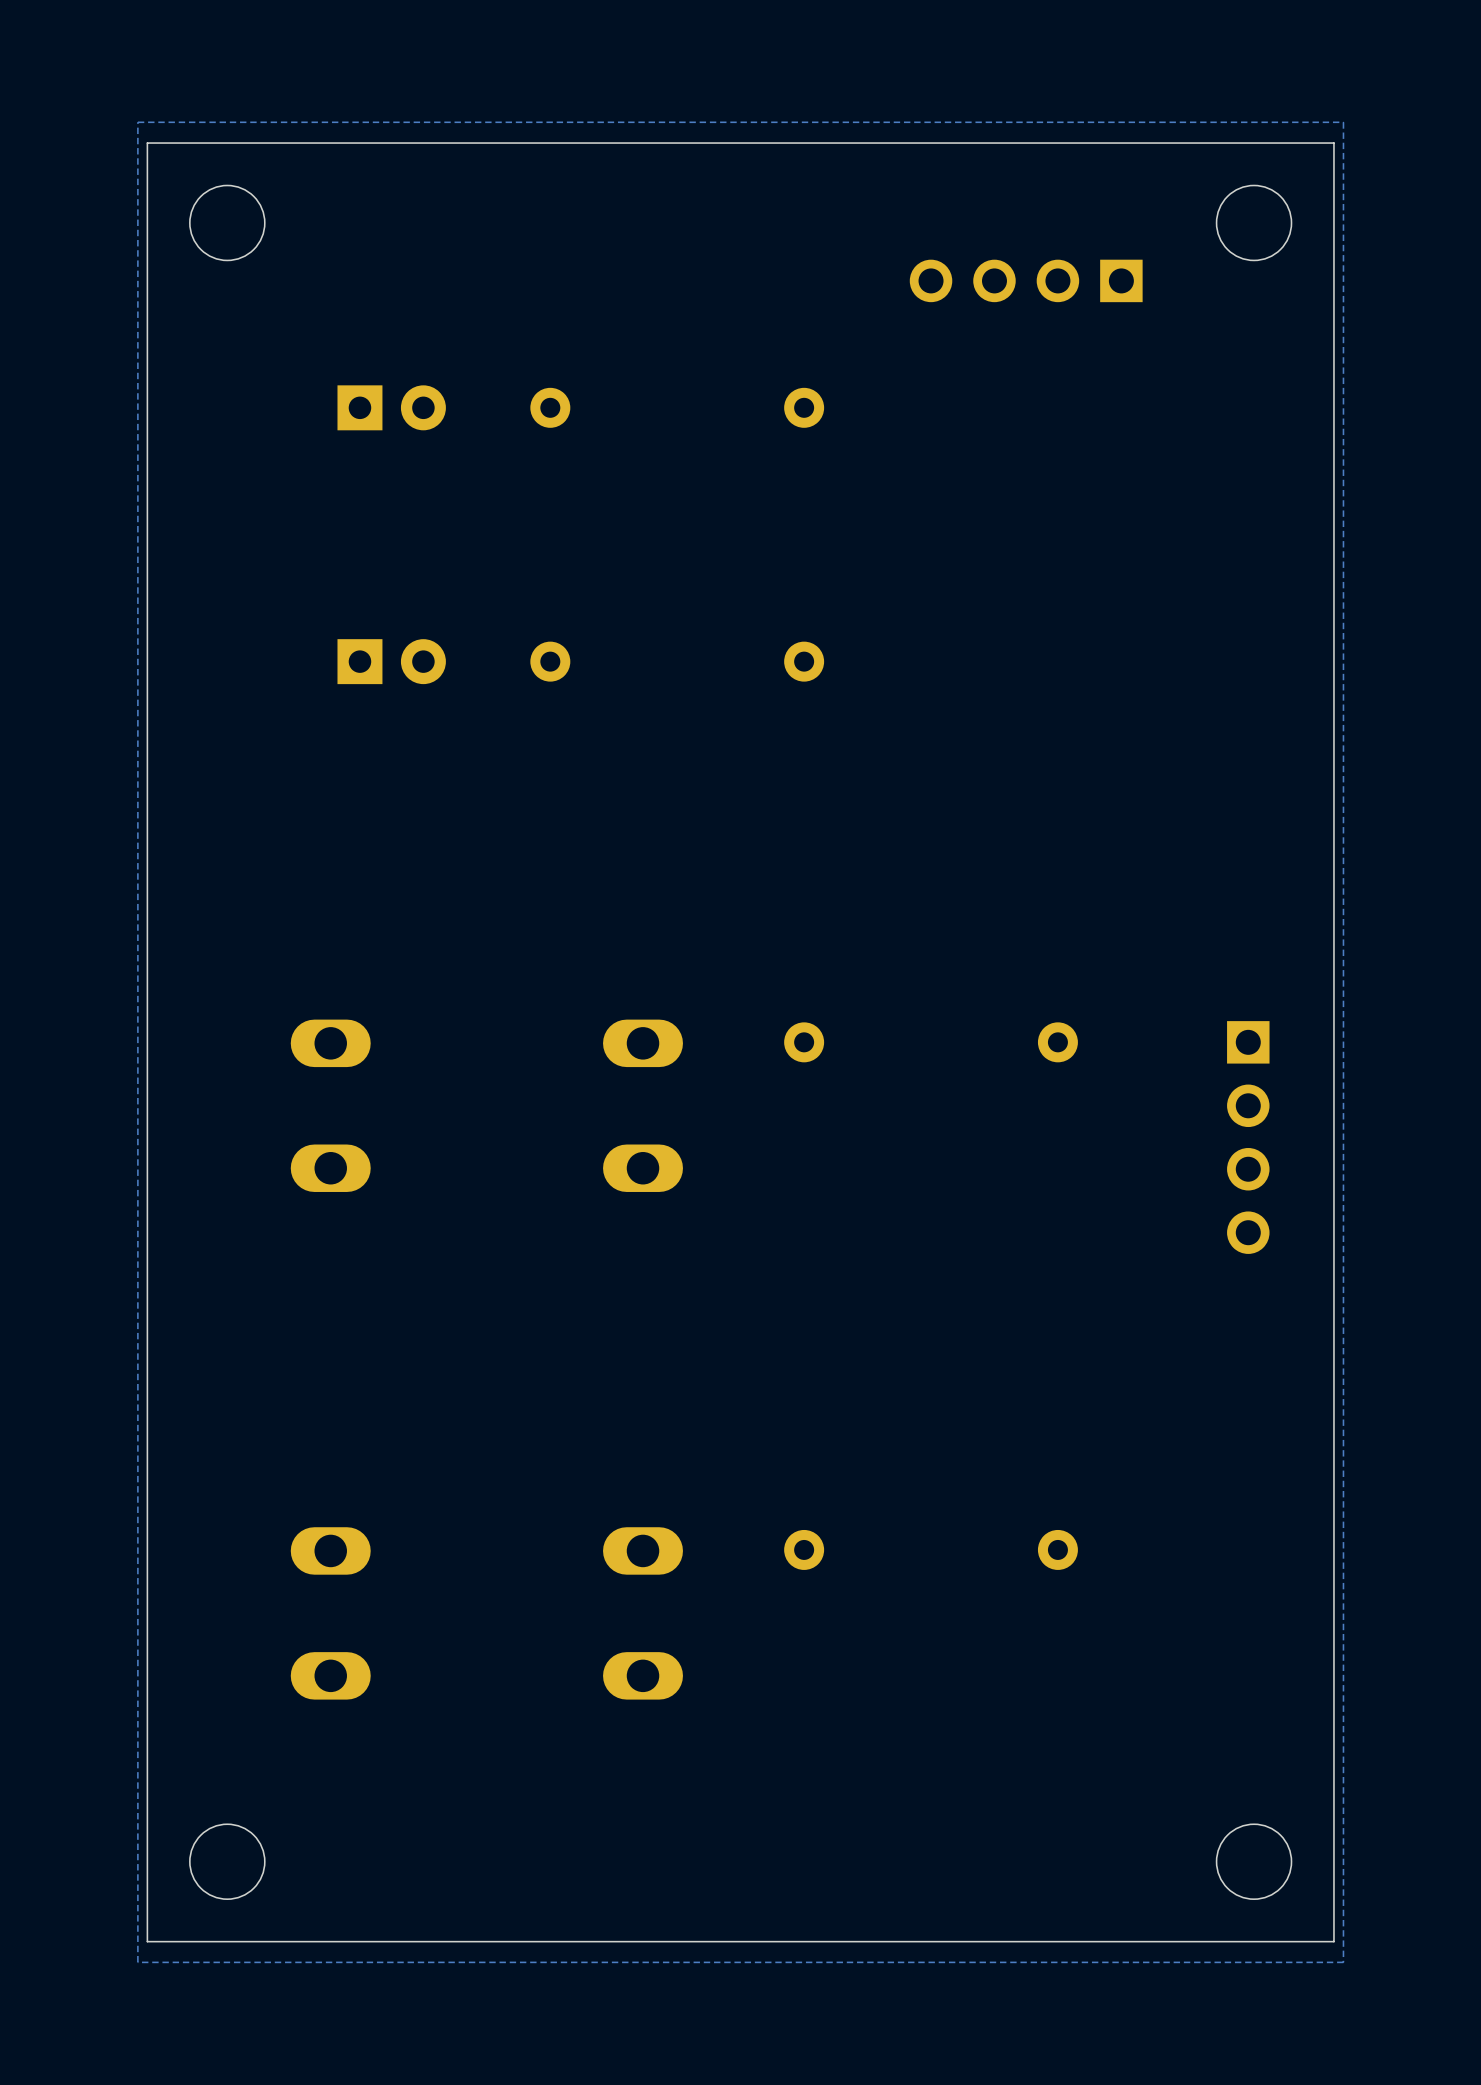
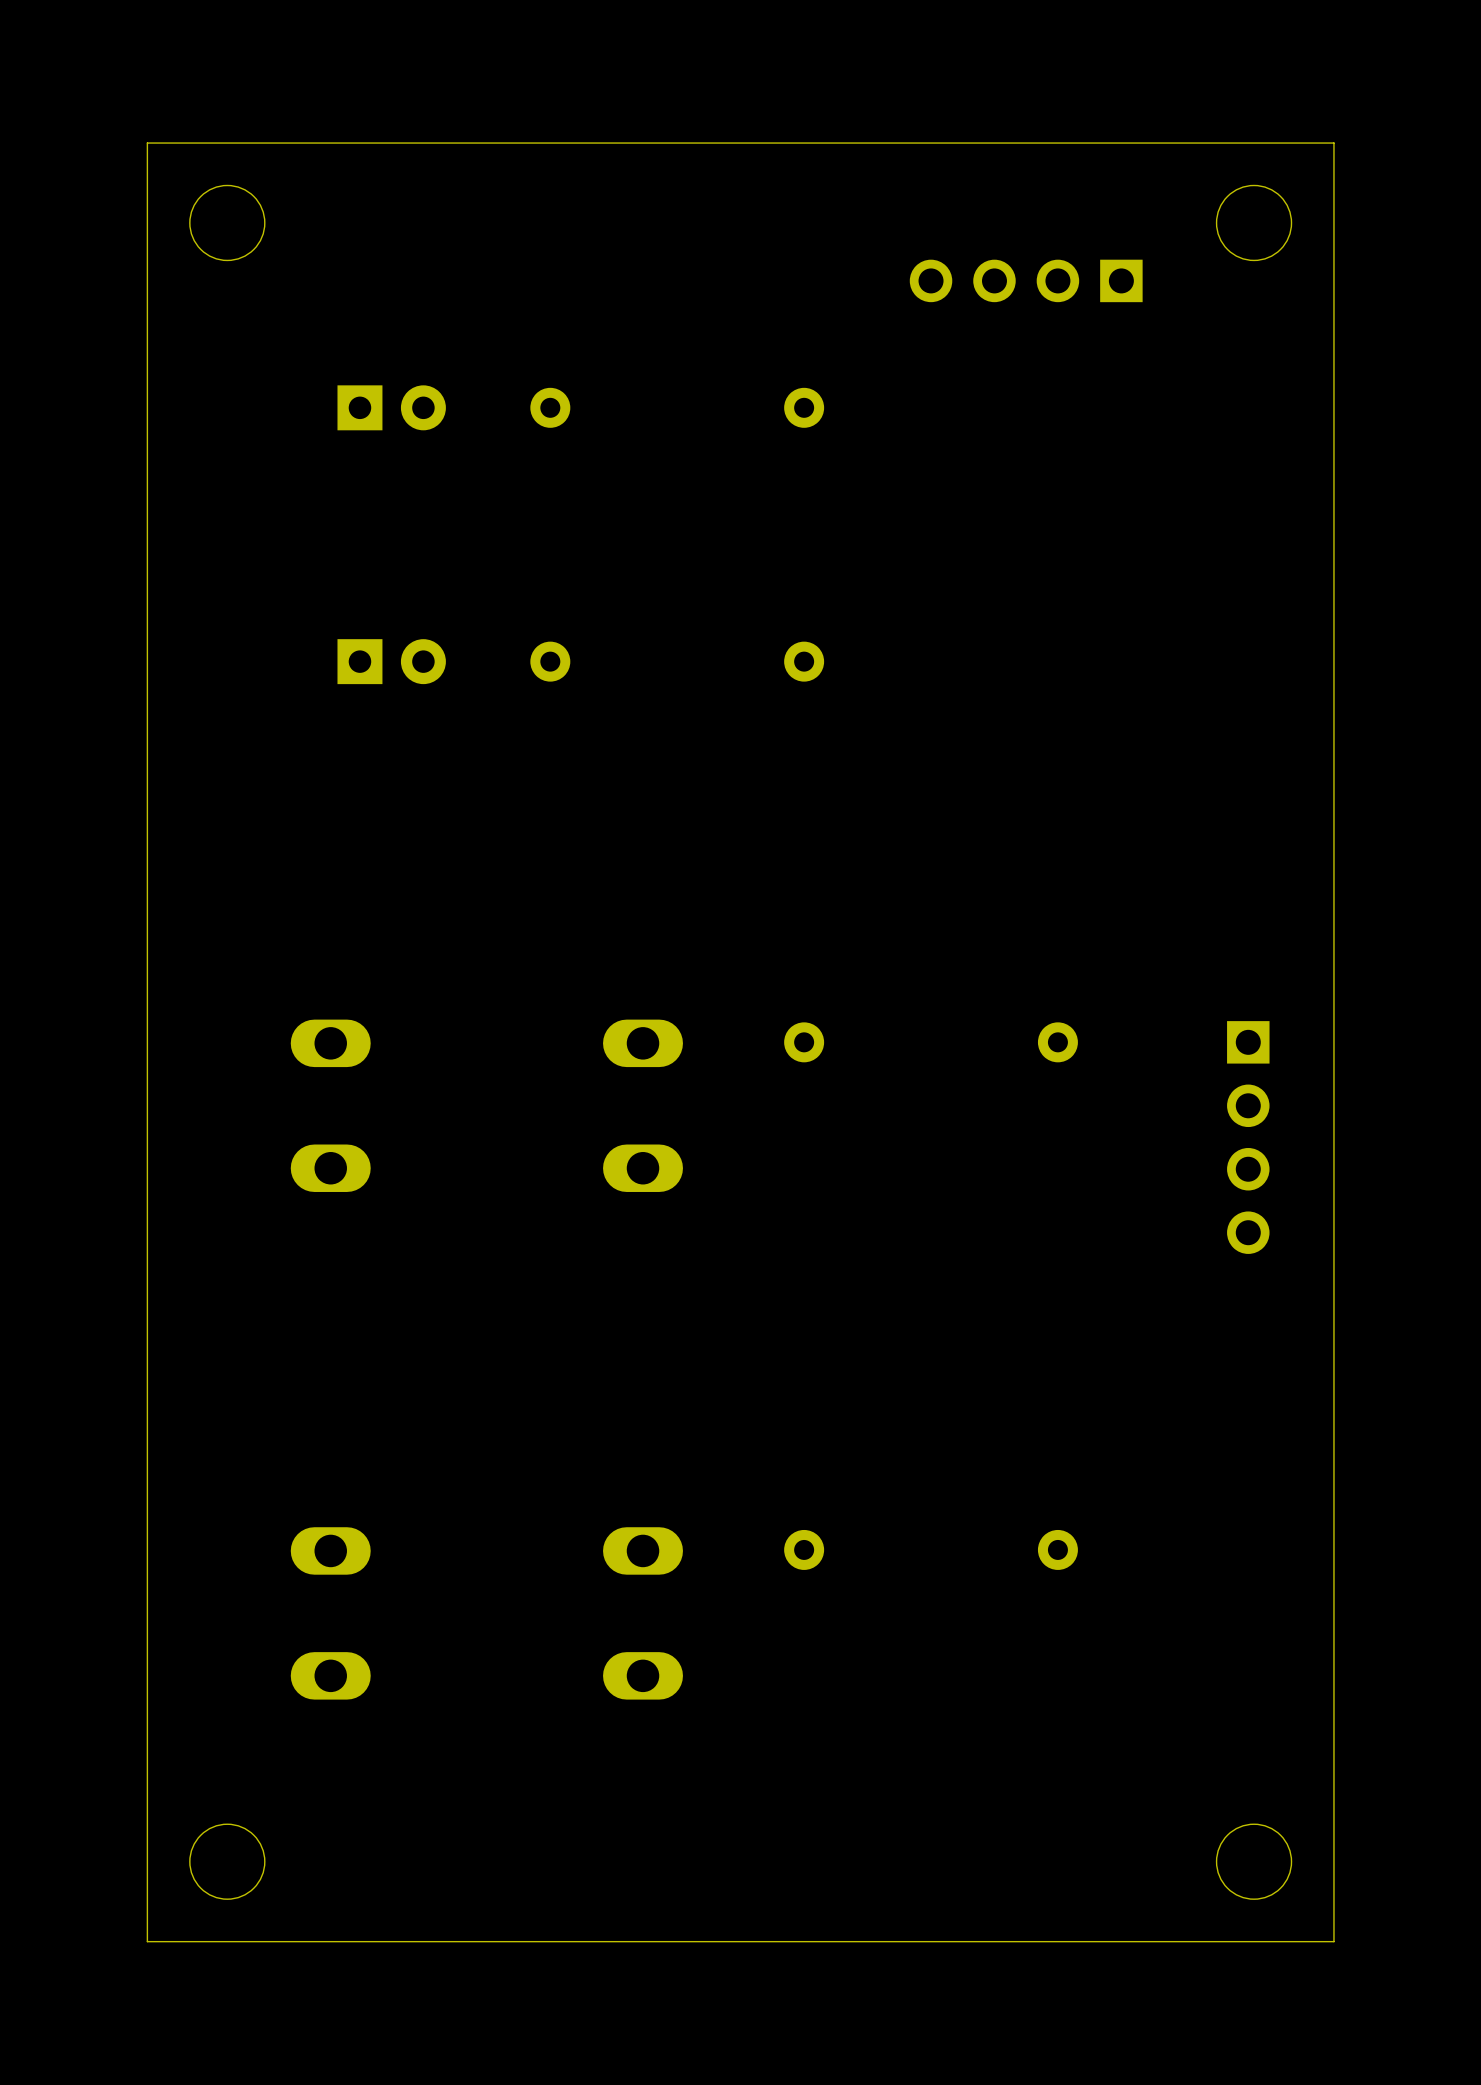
zone outline: (1343, 122) (1343, 1962) (137, 1962) (137, 122) (1343, 122) -> none

